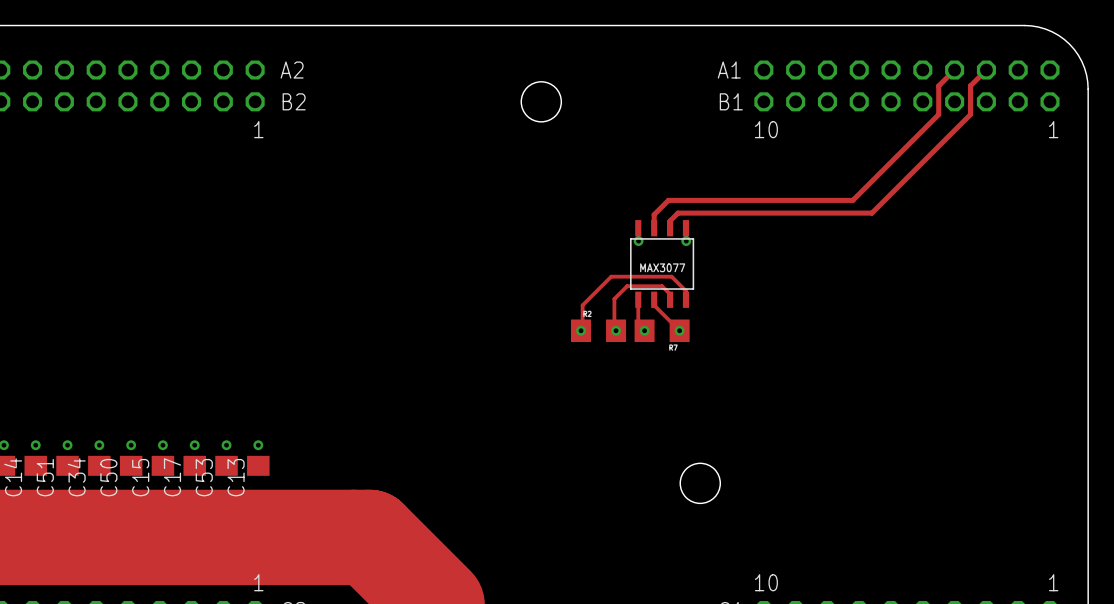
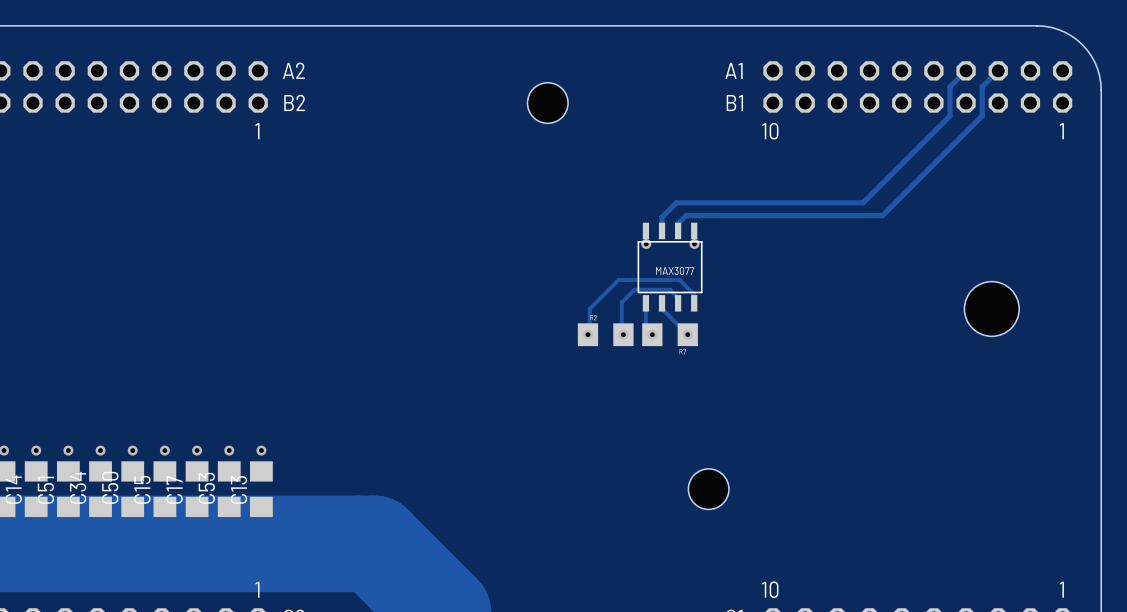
part: none -> (991, 308)

